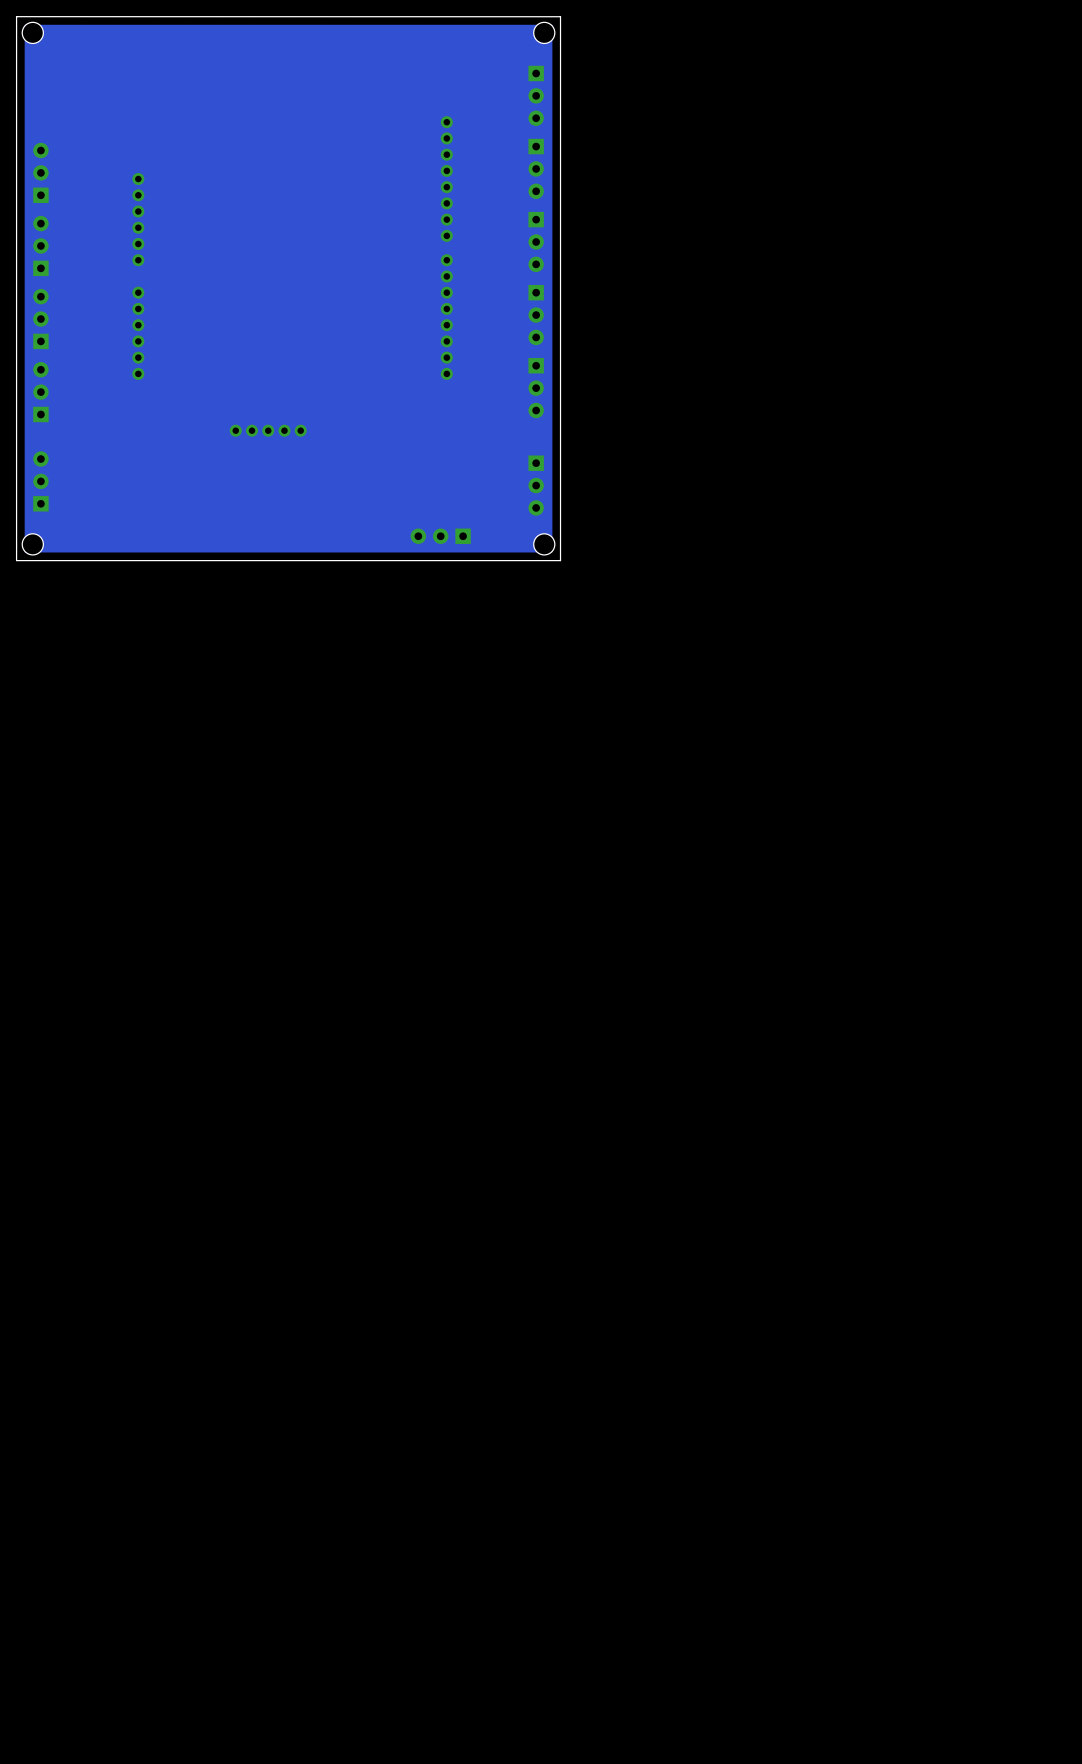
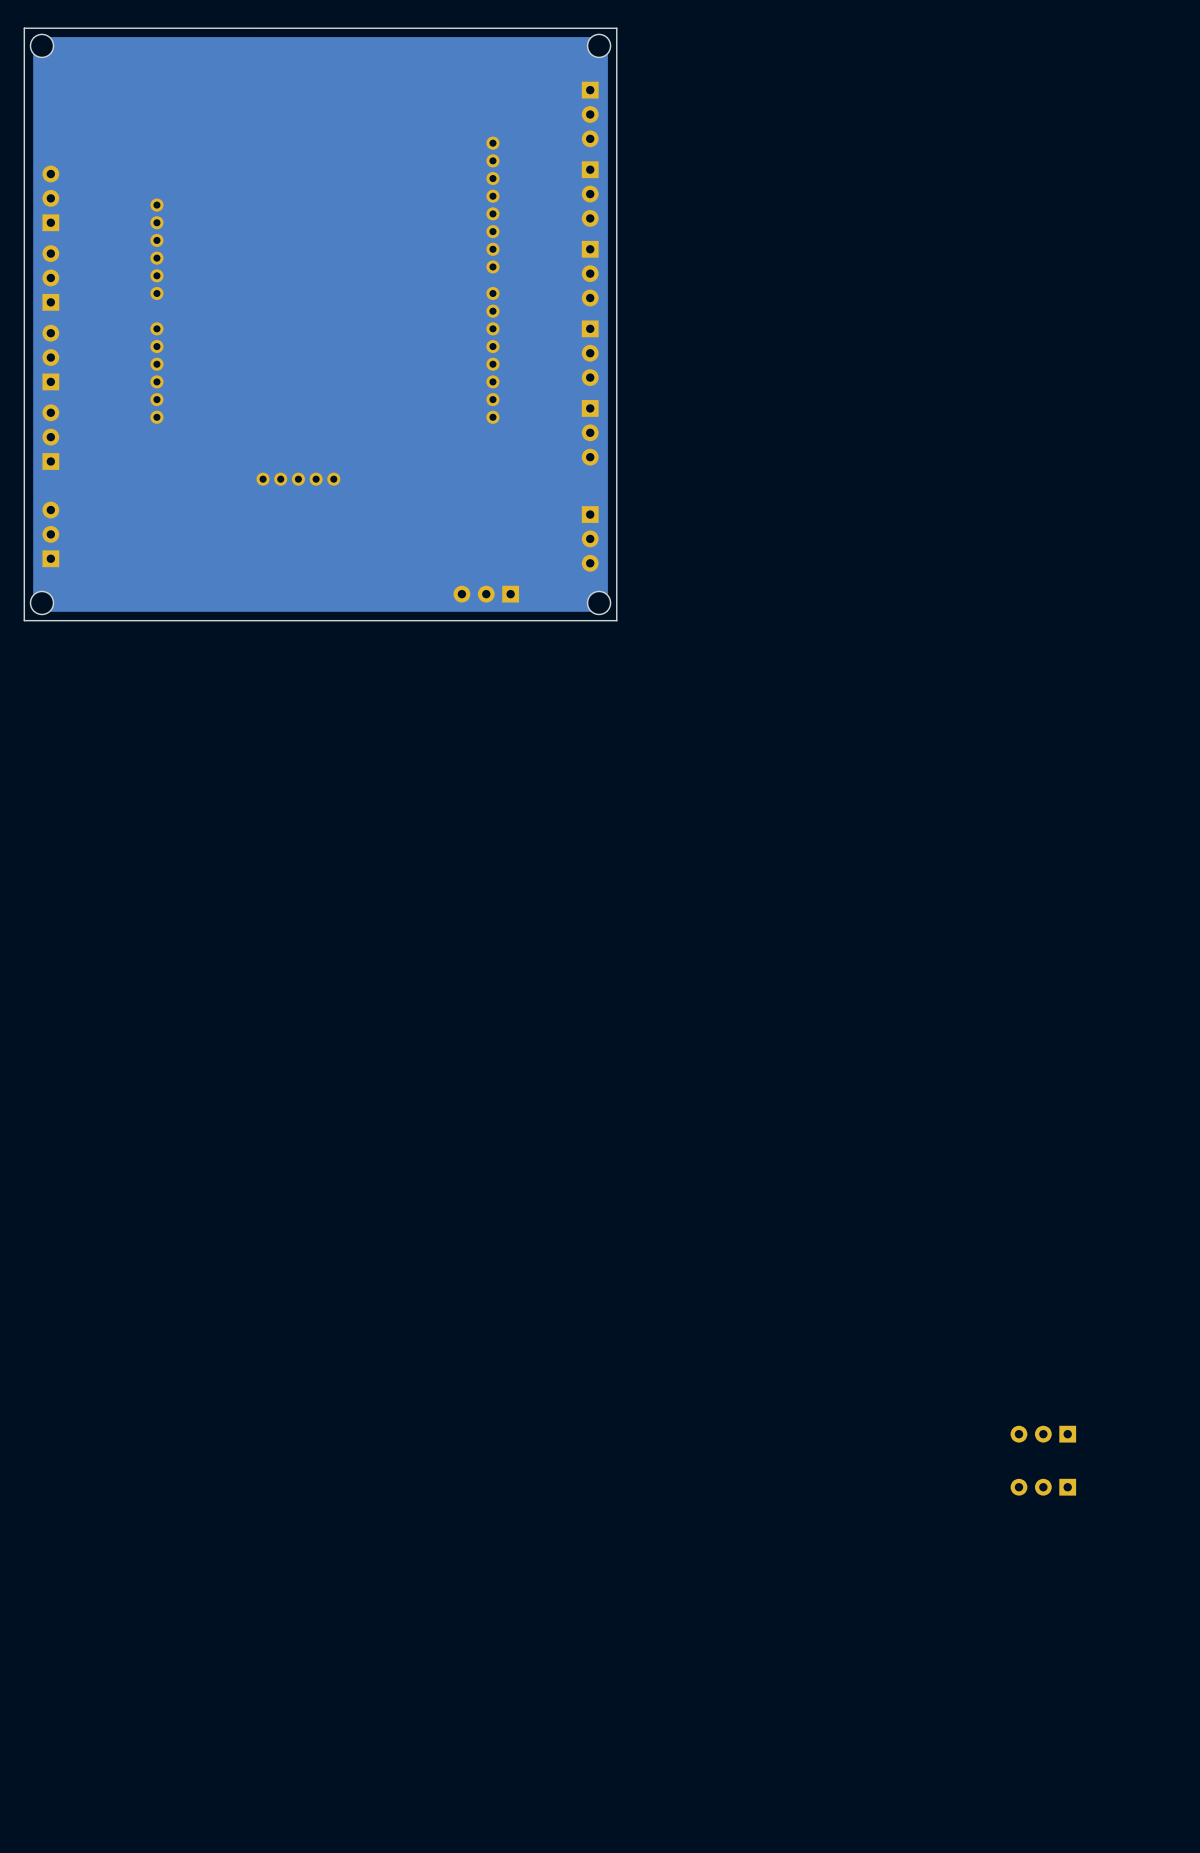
part: none -> (1043, 1434)
part: none -> (1043, 1487)

